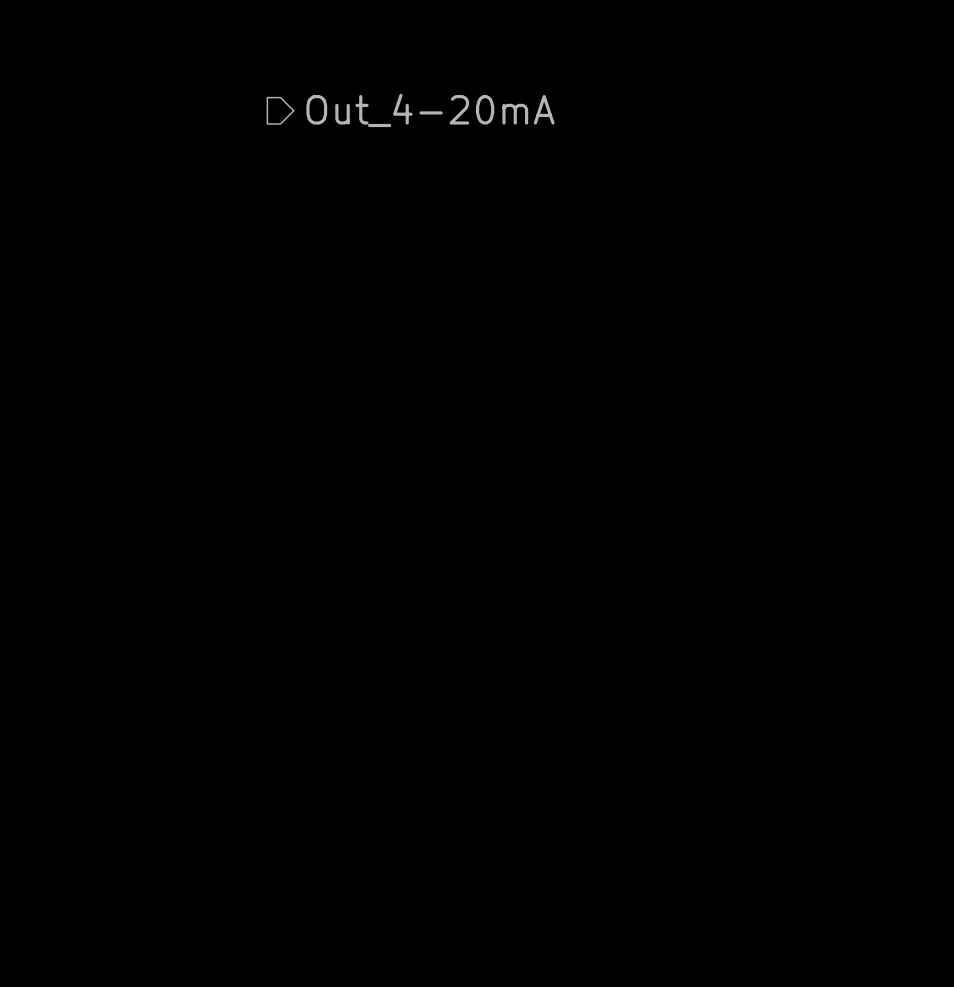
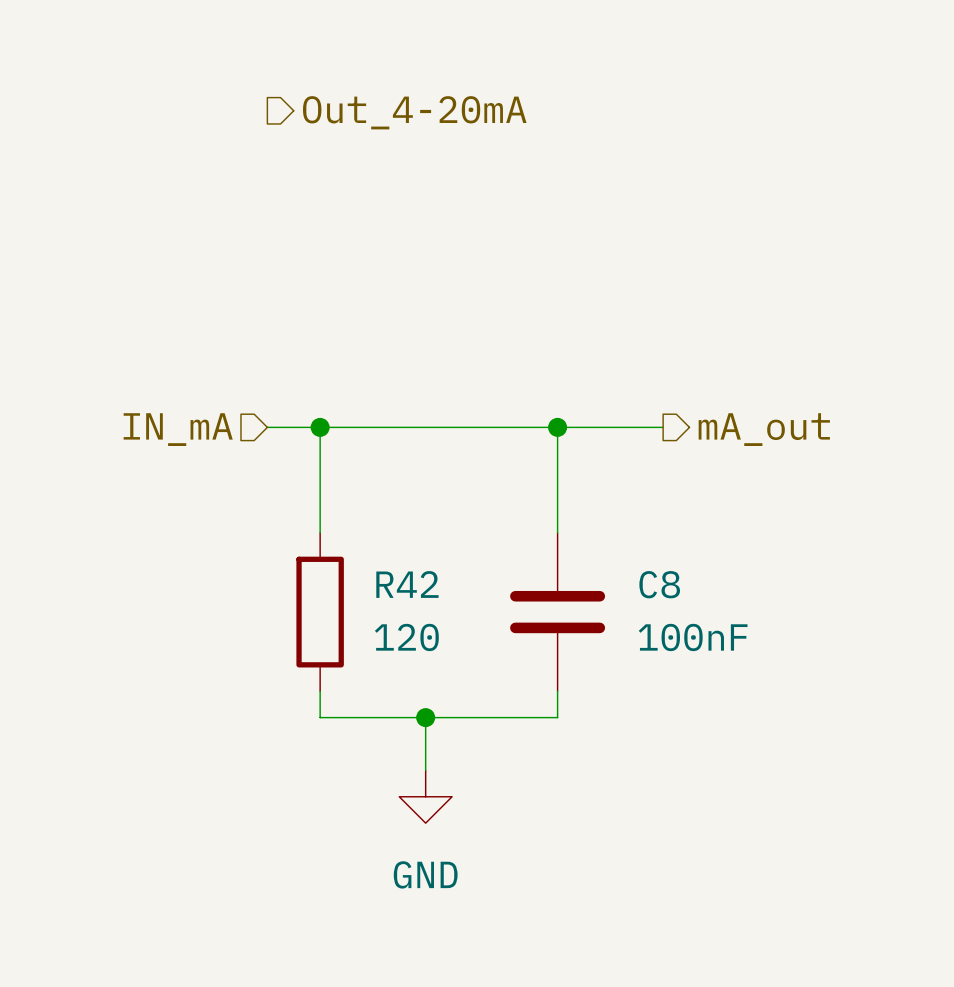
hierarchical label: none -> IN_mA (178, 429)
wire: none -> (267, 427) (663, 427)
wire: none -> (320, 427) (320, 532)
junction: none -> (320, 427)
wire: none -> (557, 427) (557, 532)
junction: none -> (557, 427)
hierarchical label: none -> mA_out (764, 429)
R42: none -> 120 (320, 612)
C8: none -> 100nF (557, 612)
wire: none -> (320, 691) (320, 717) (557, 717) (557, 691)
wire: none -> (425, 717) (425, 770)
junction: none -> (425, 717)
power symbol: none -> GND (425, 796)

